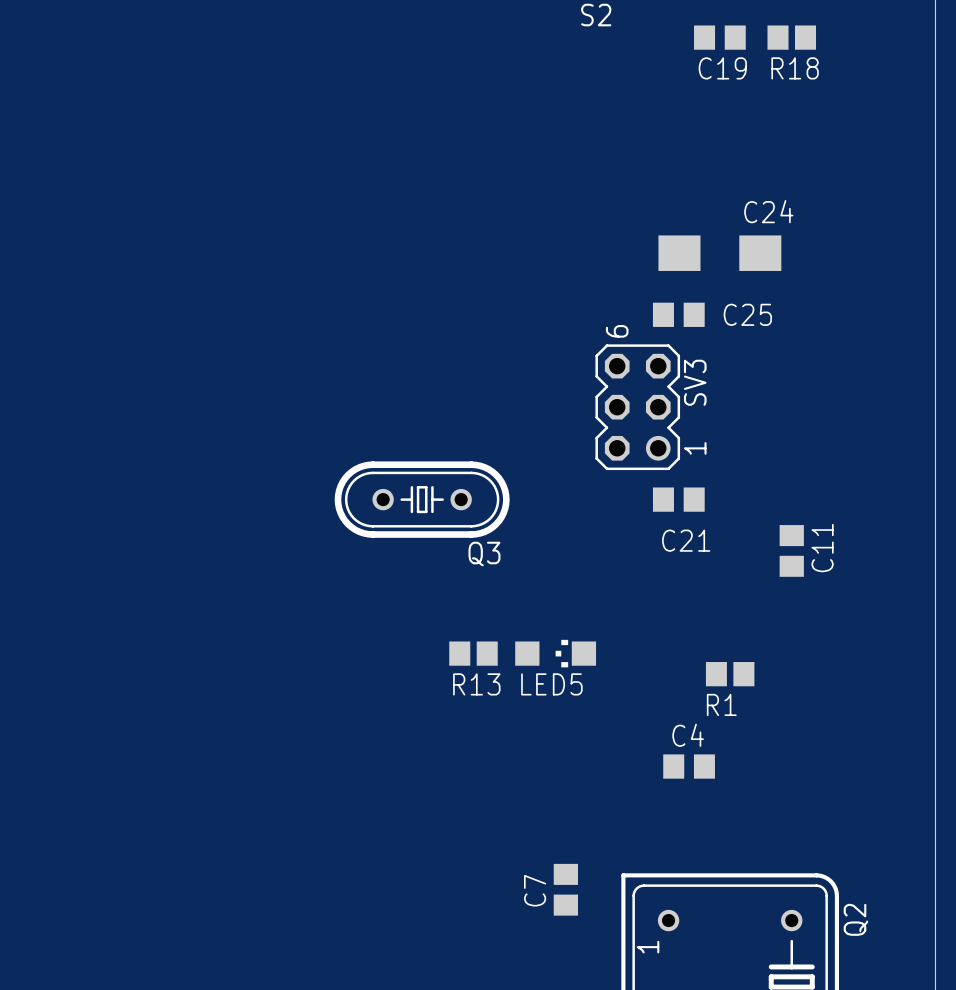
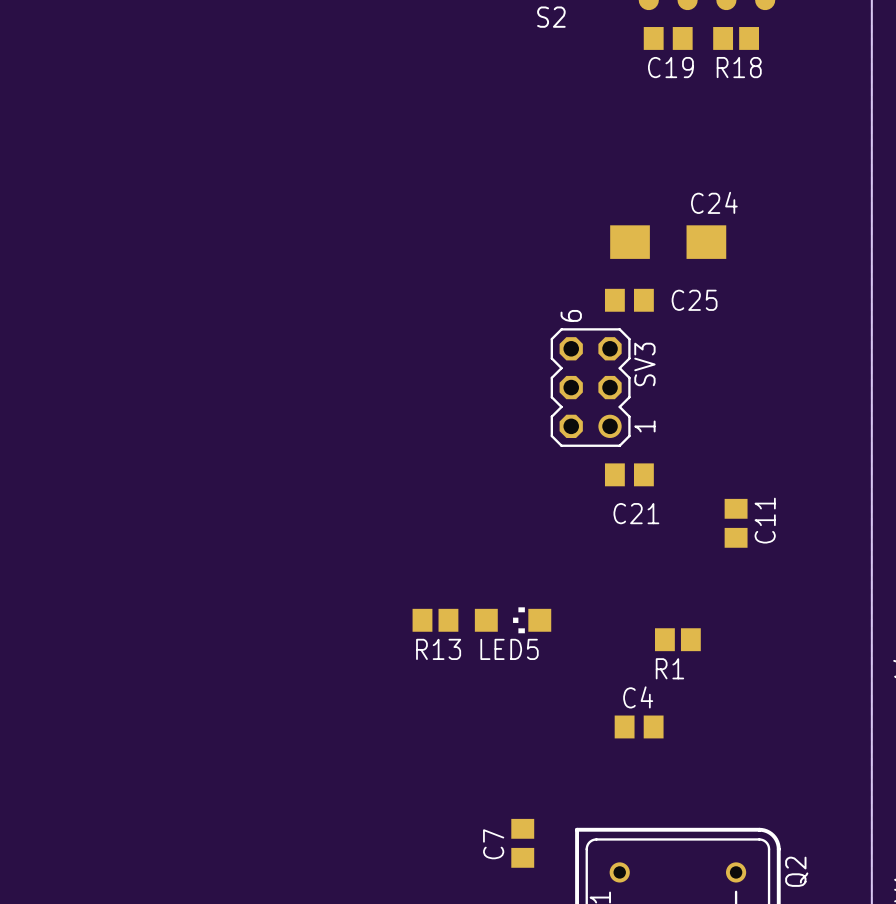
Q3: (422, 499) -> none

